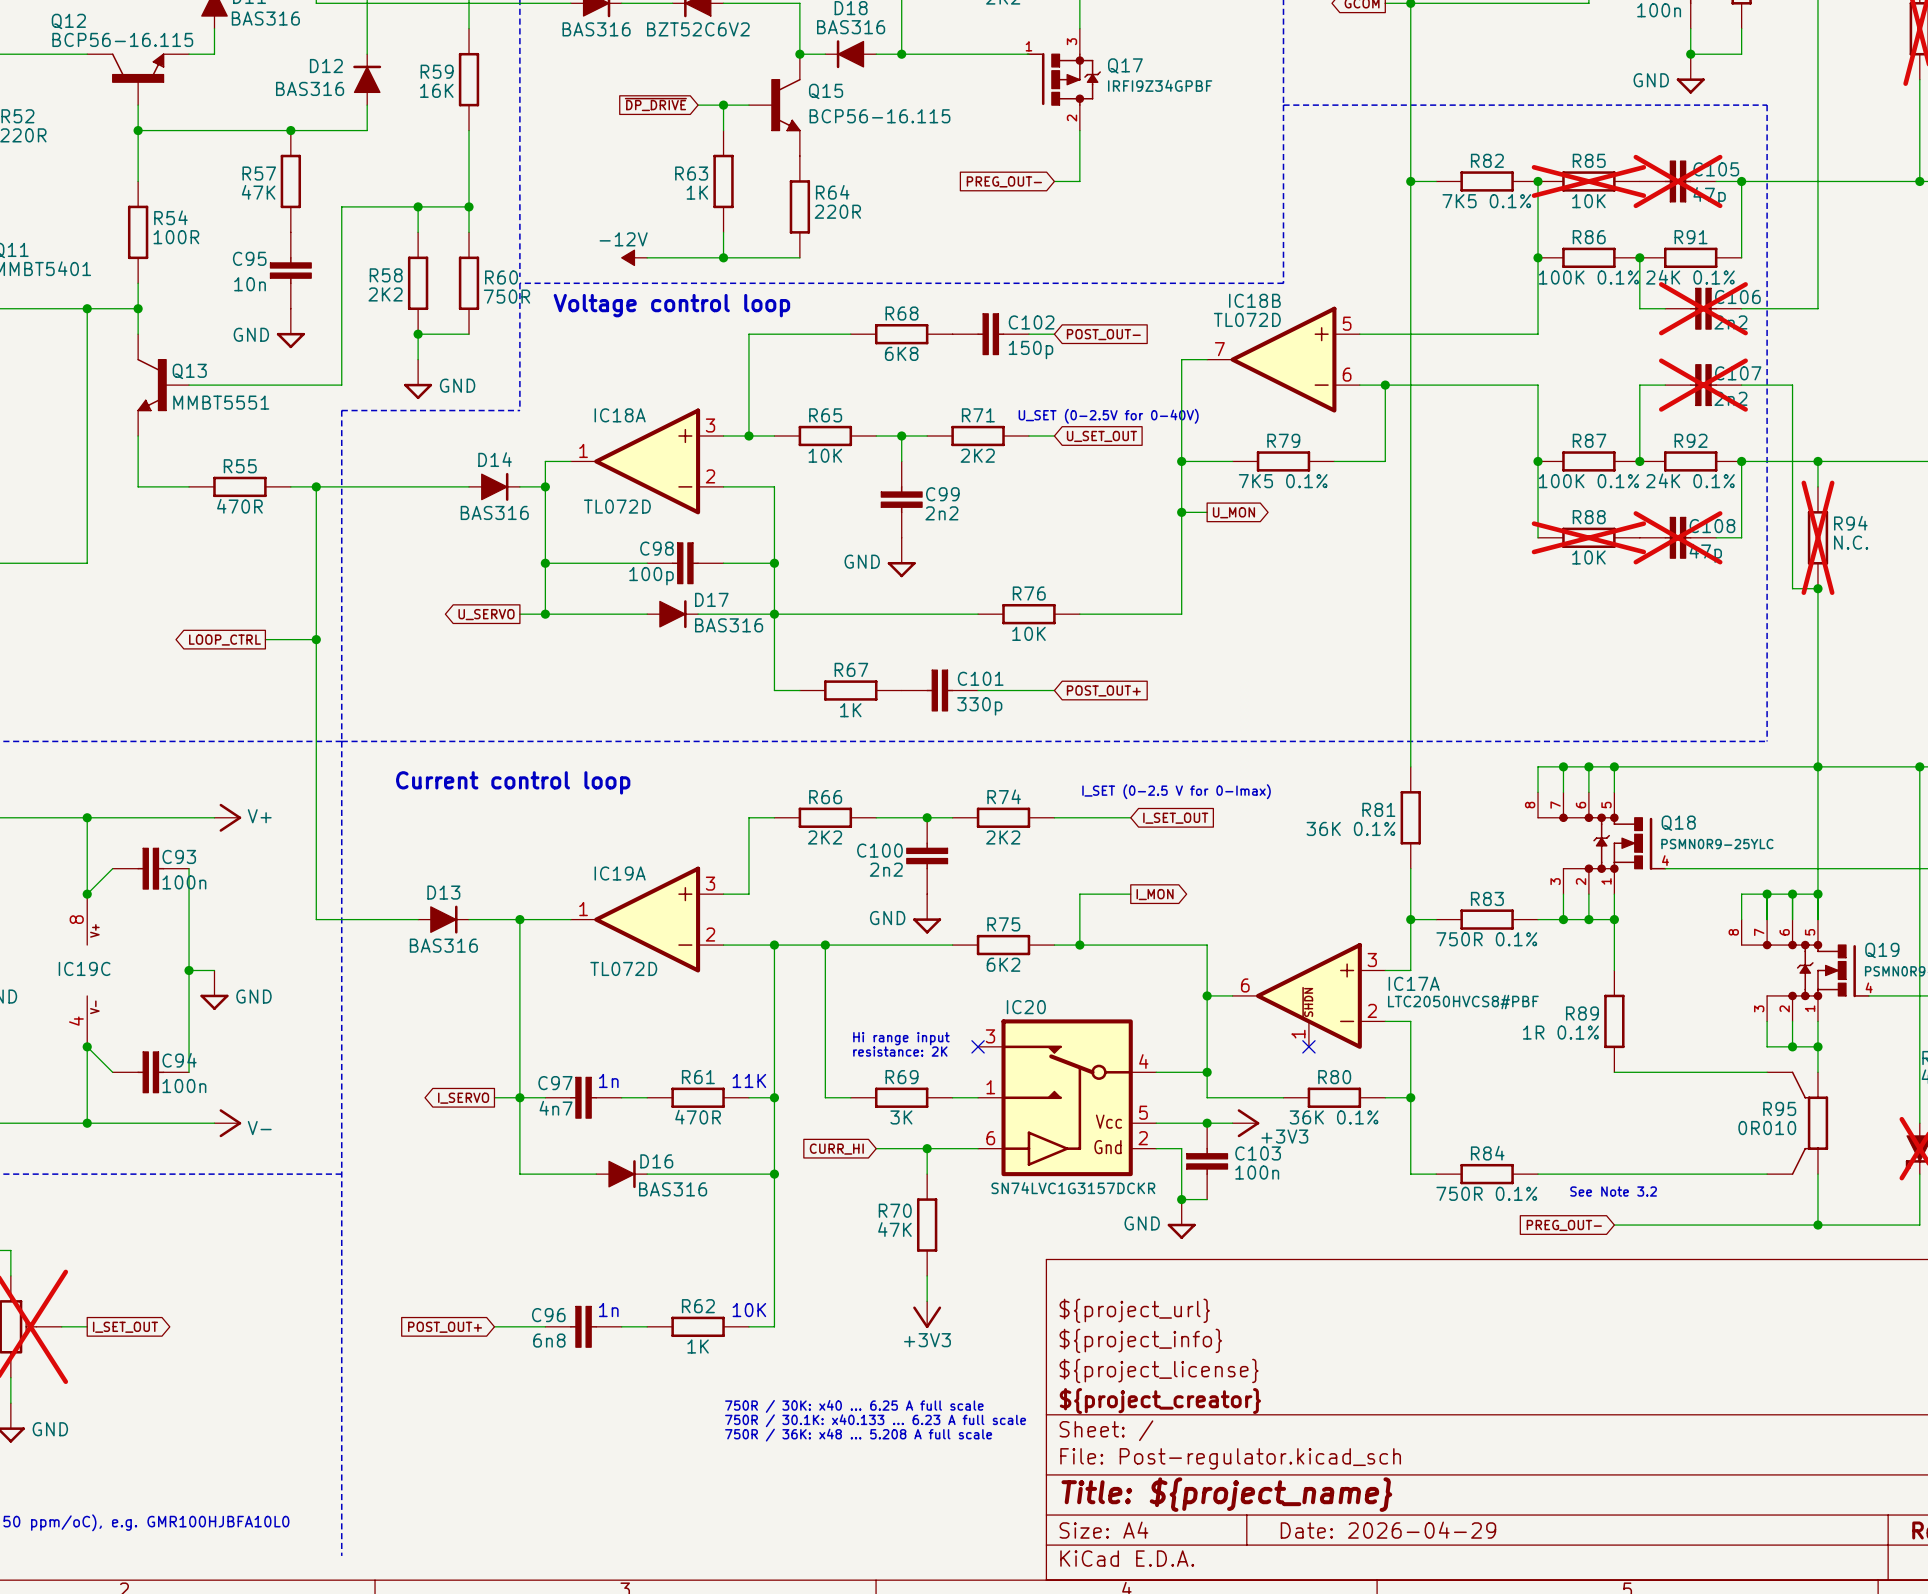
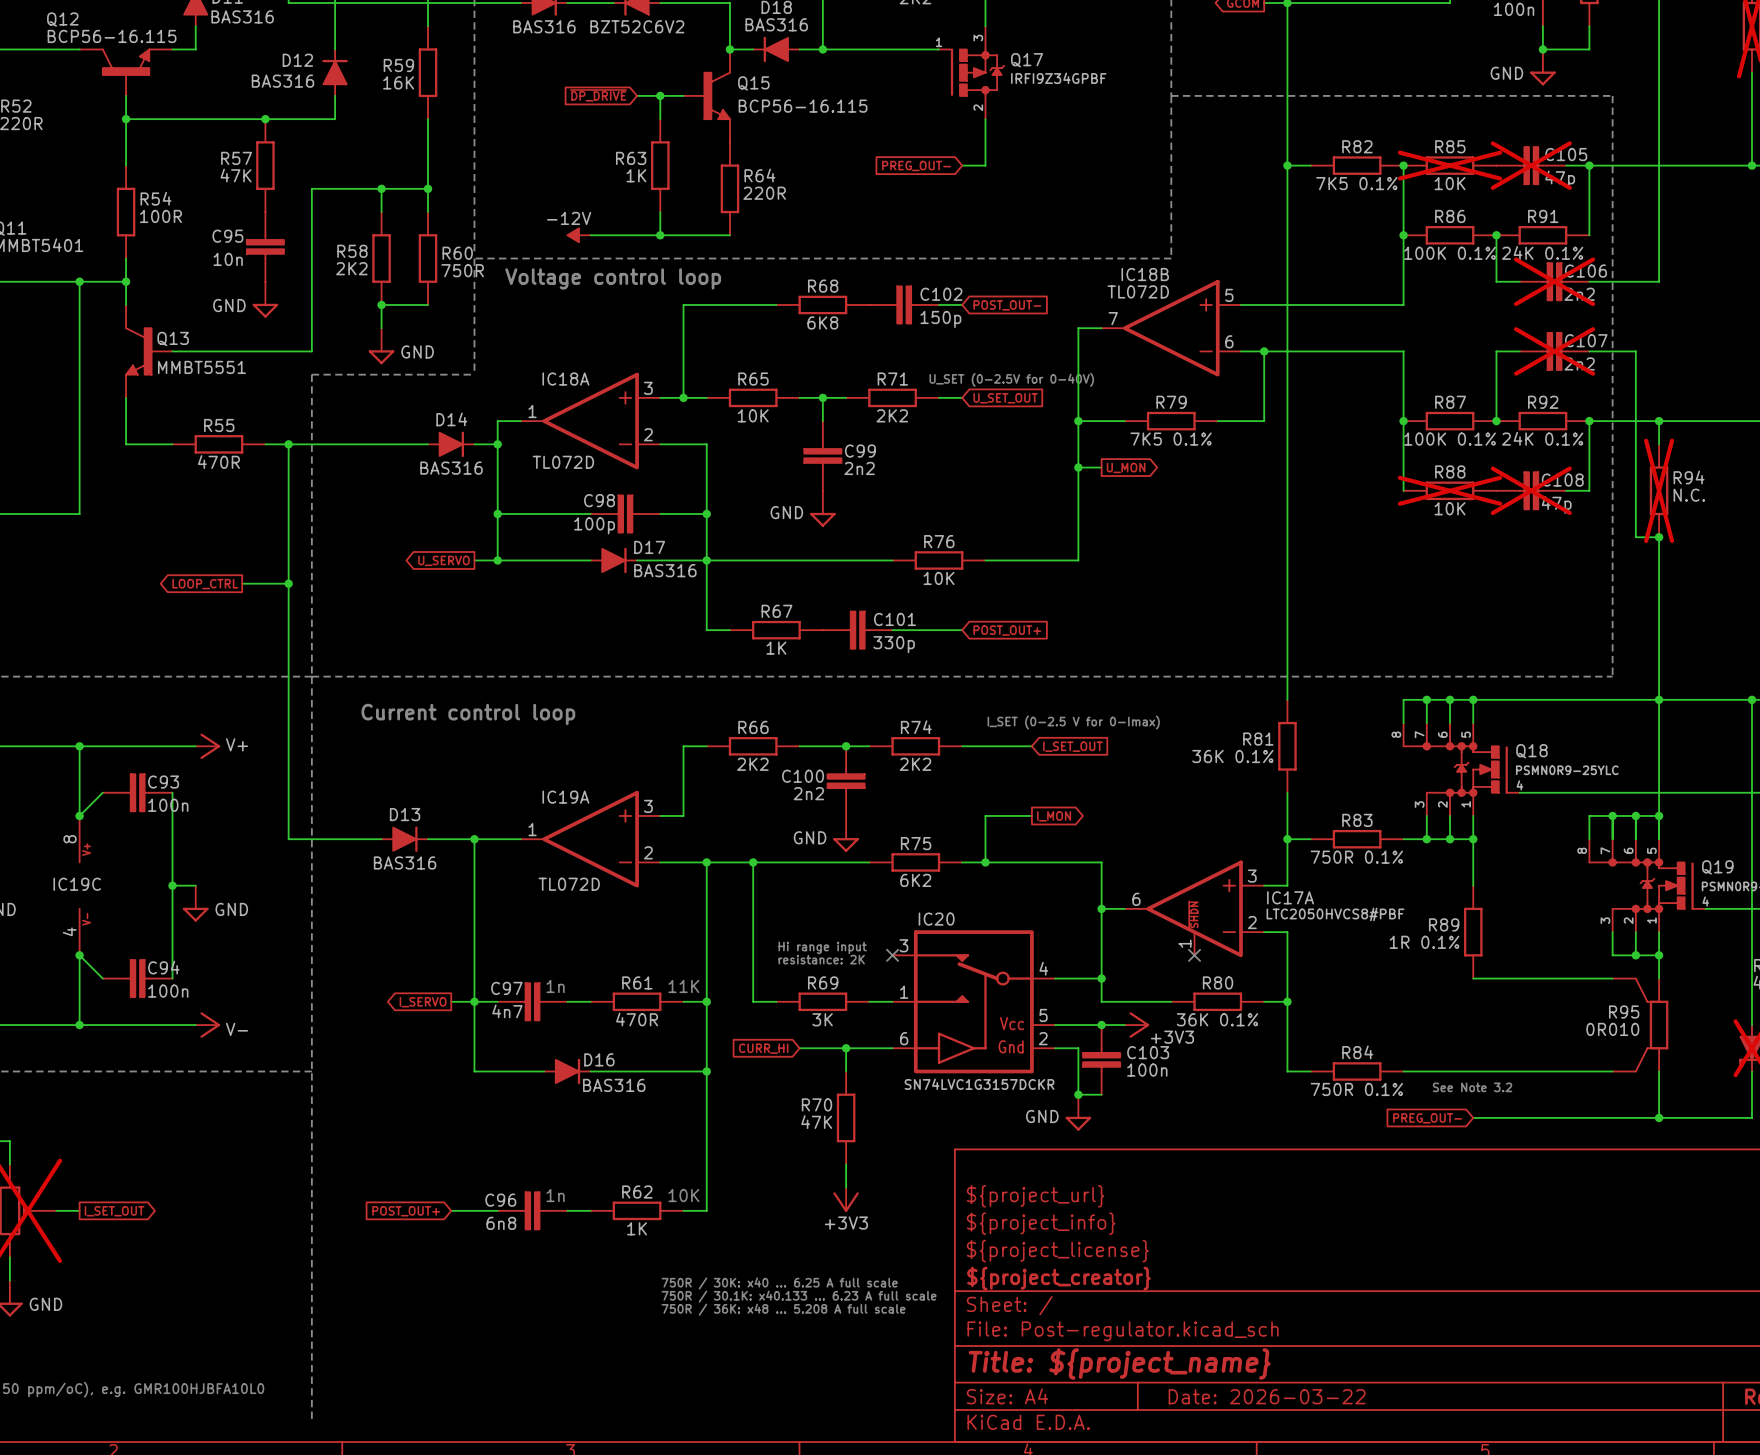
title block: Date: 2026-04-29 (1388, 1530) -> Date: 2026-03-22 (1267, 1396)

